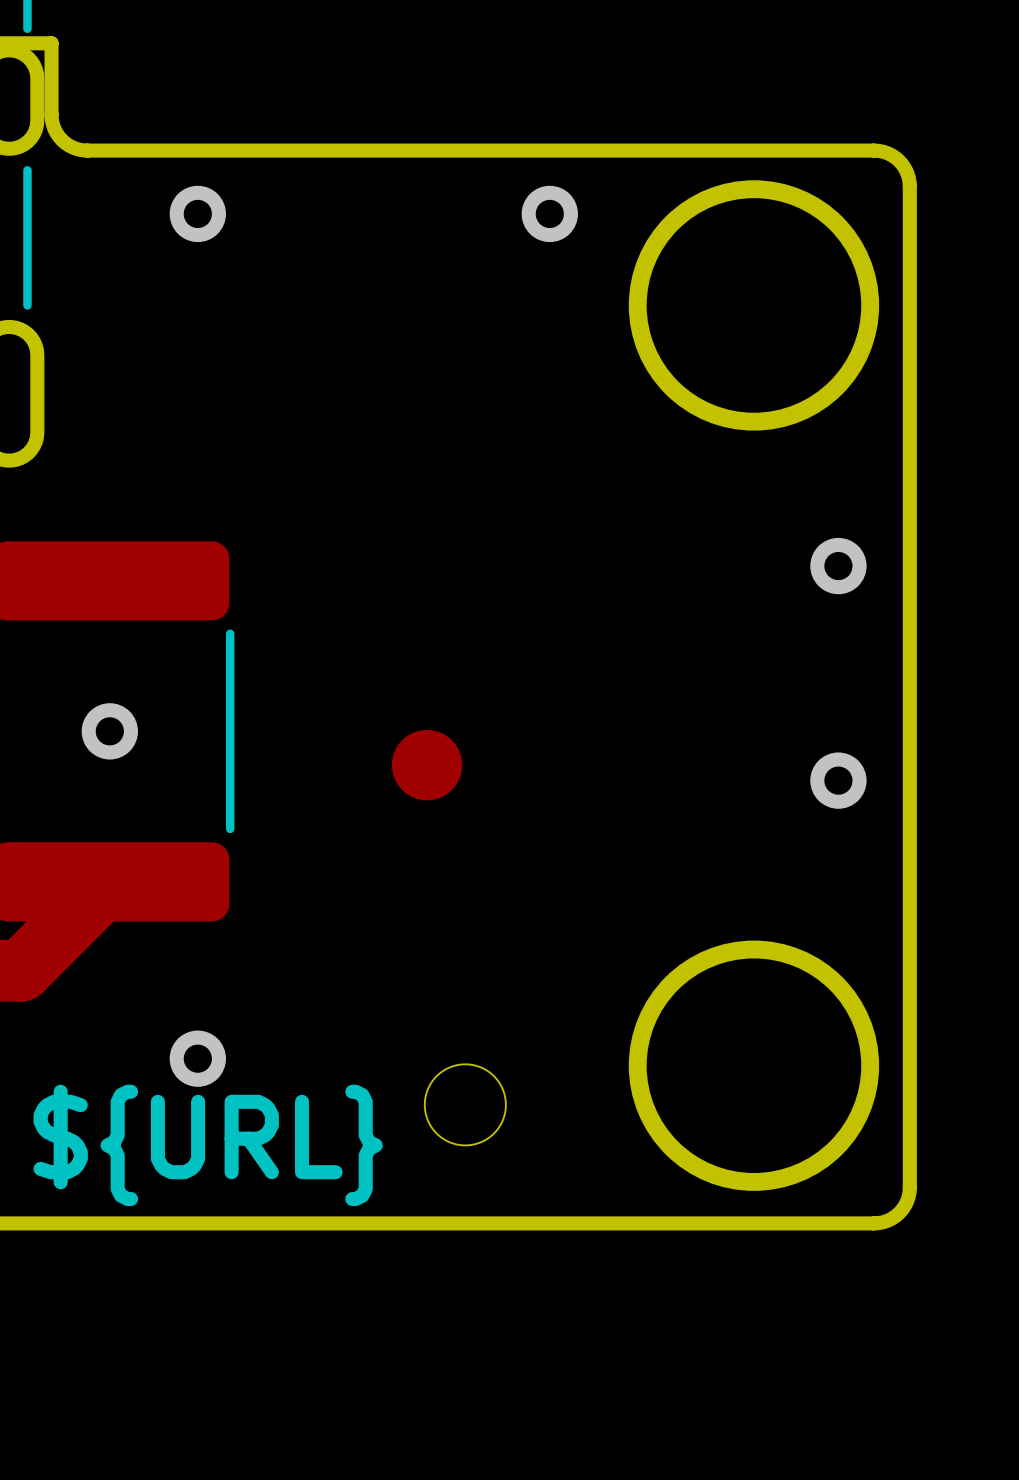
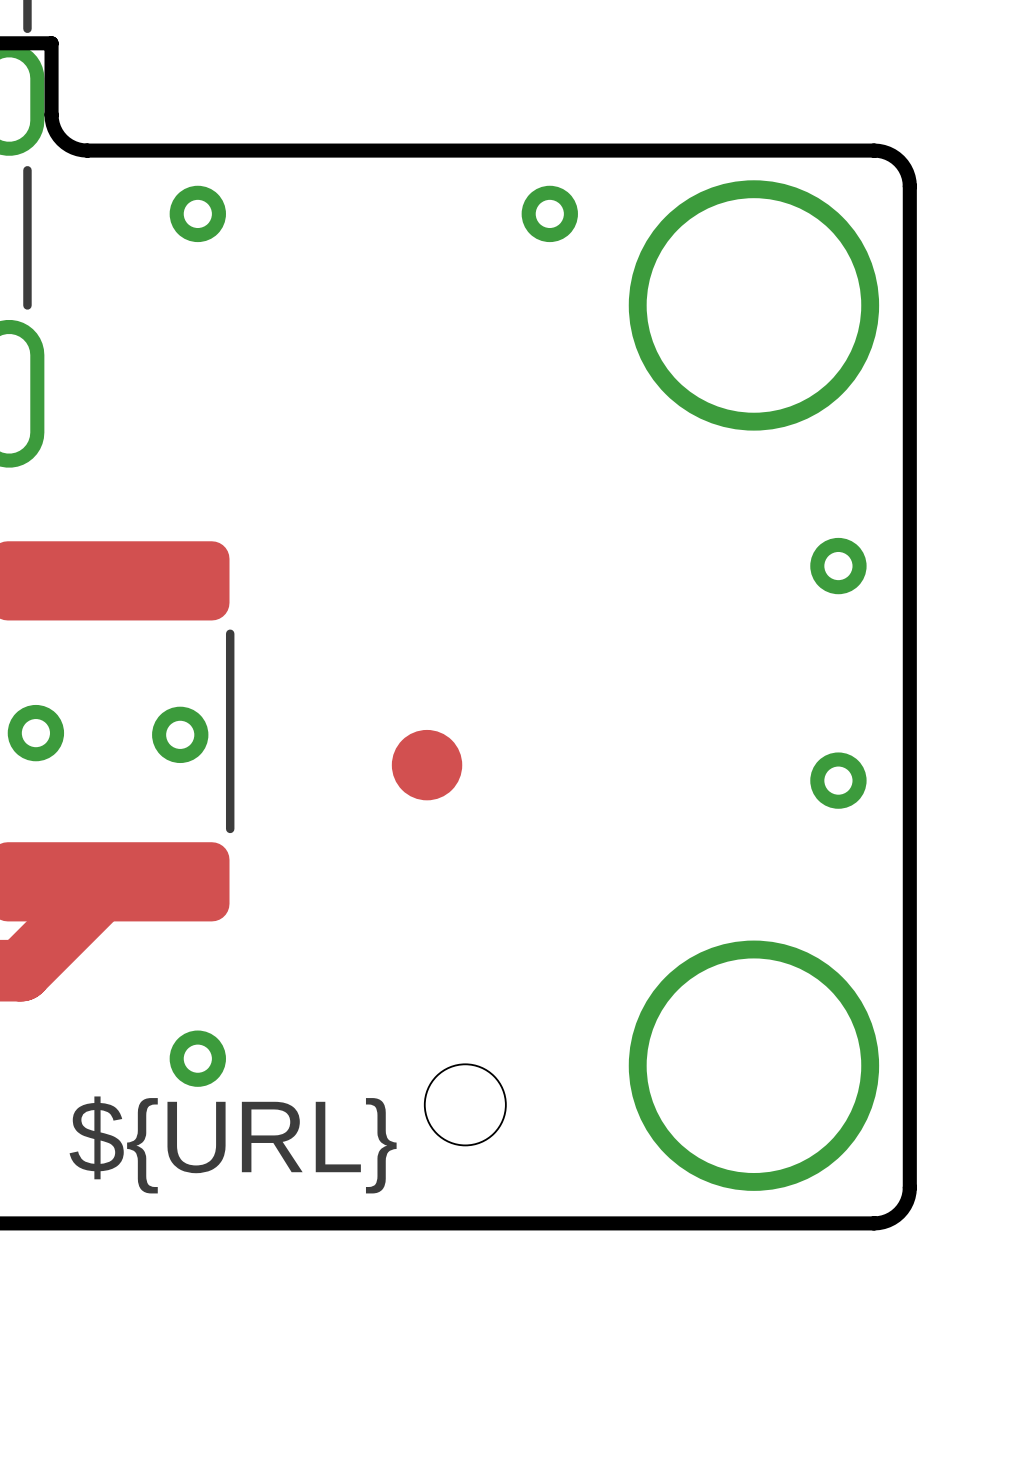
via: (109, 731) -> none
via: none -> (35, 733)
via: none -> (180, 734)

